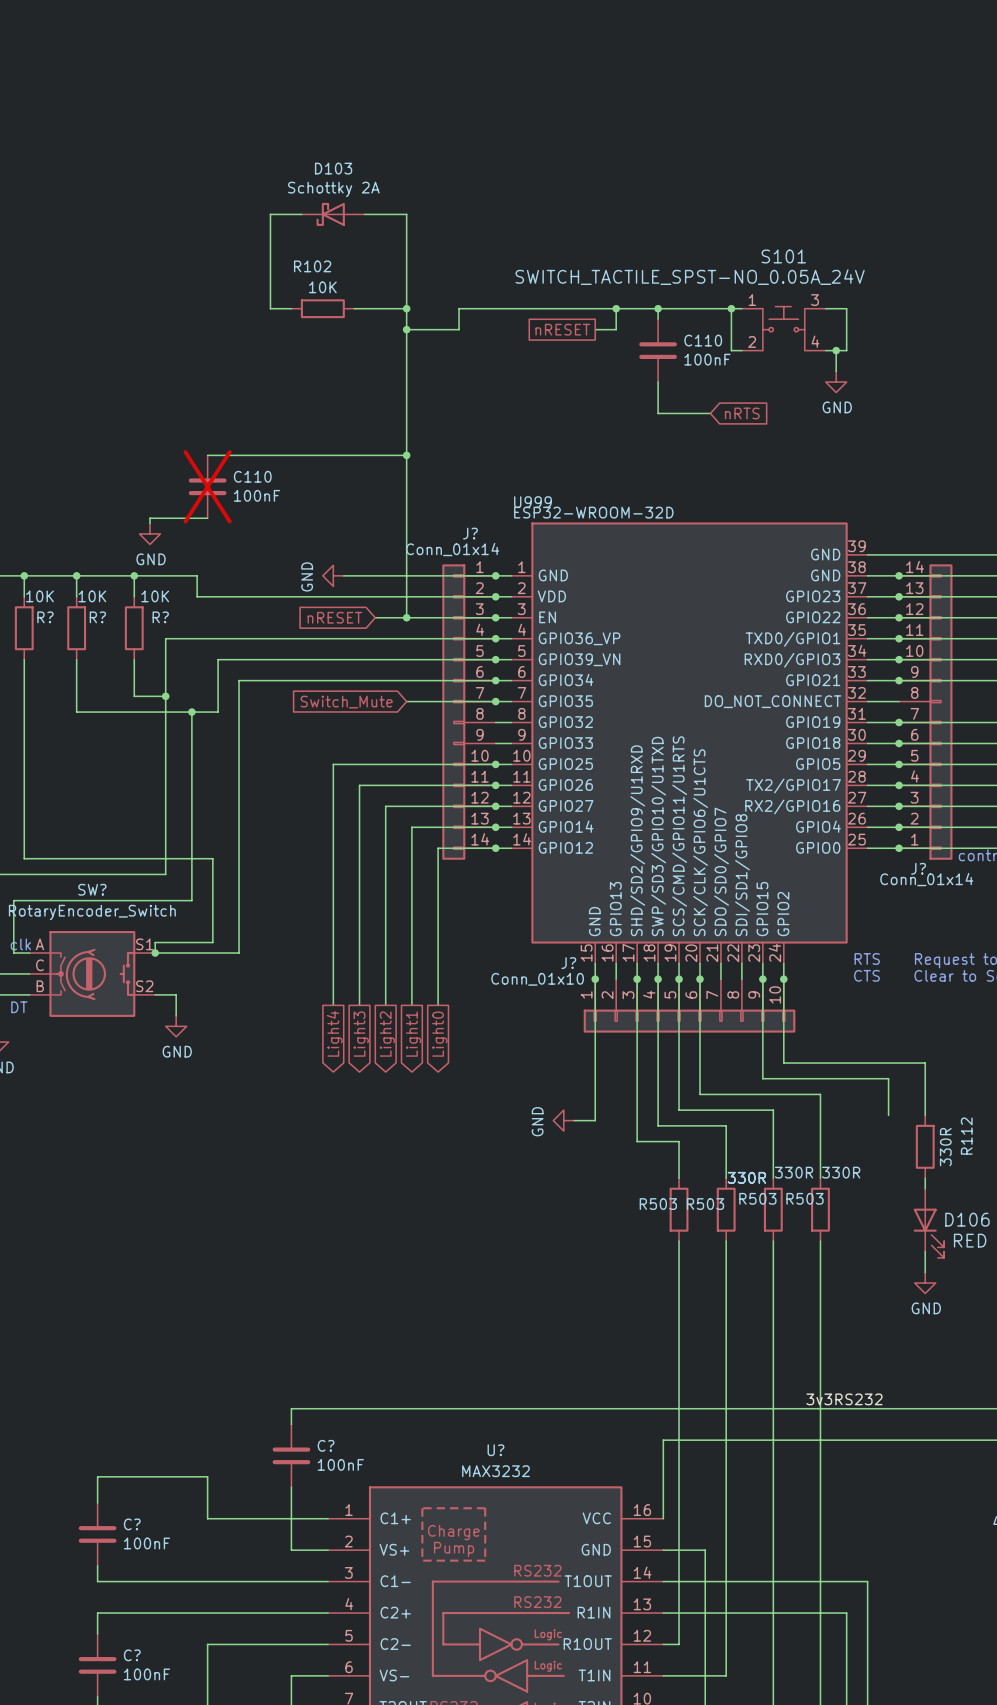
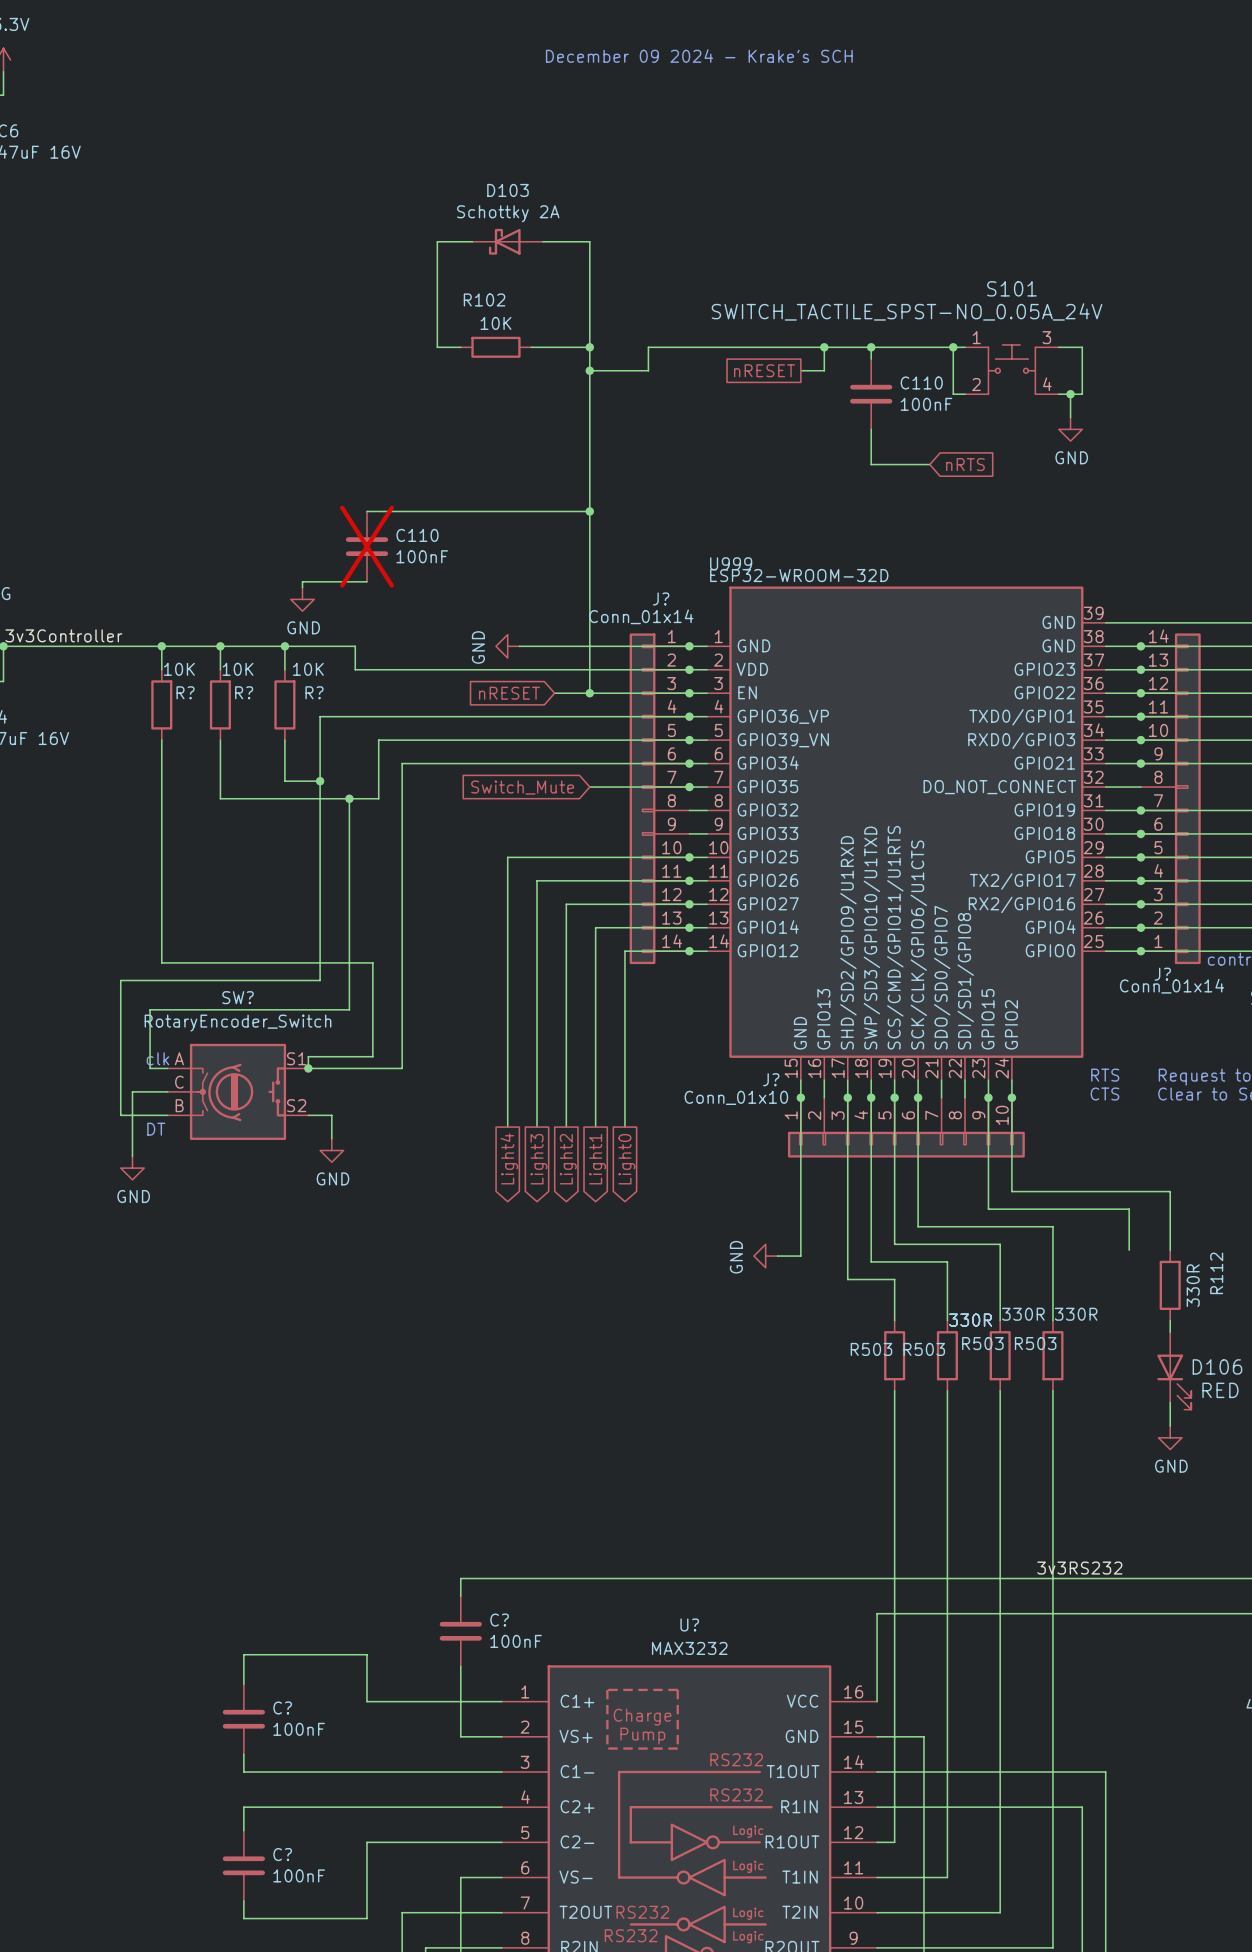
text: none -> December 09 2024 - Krake's SCH (699, 56)

